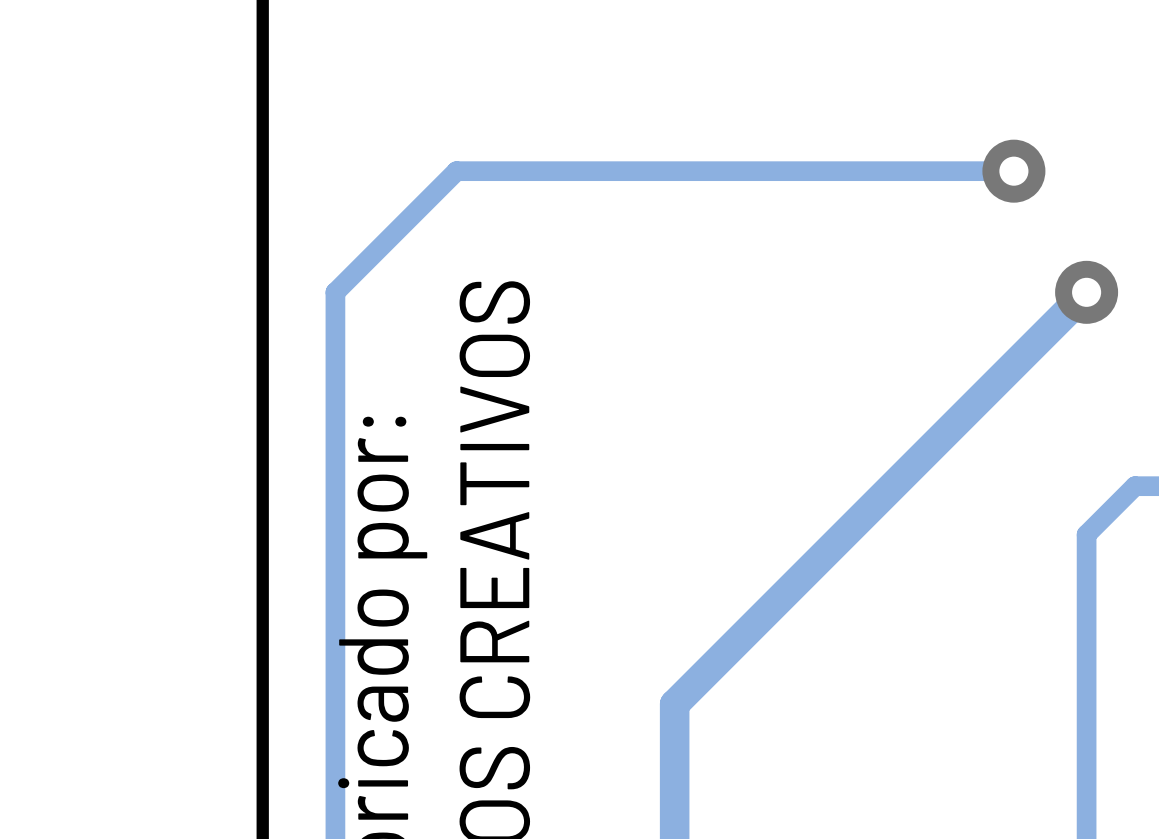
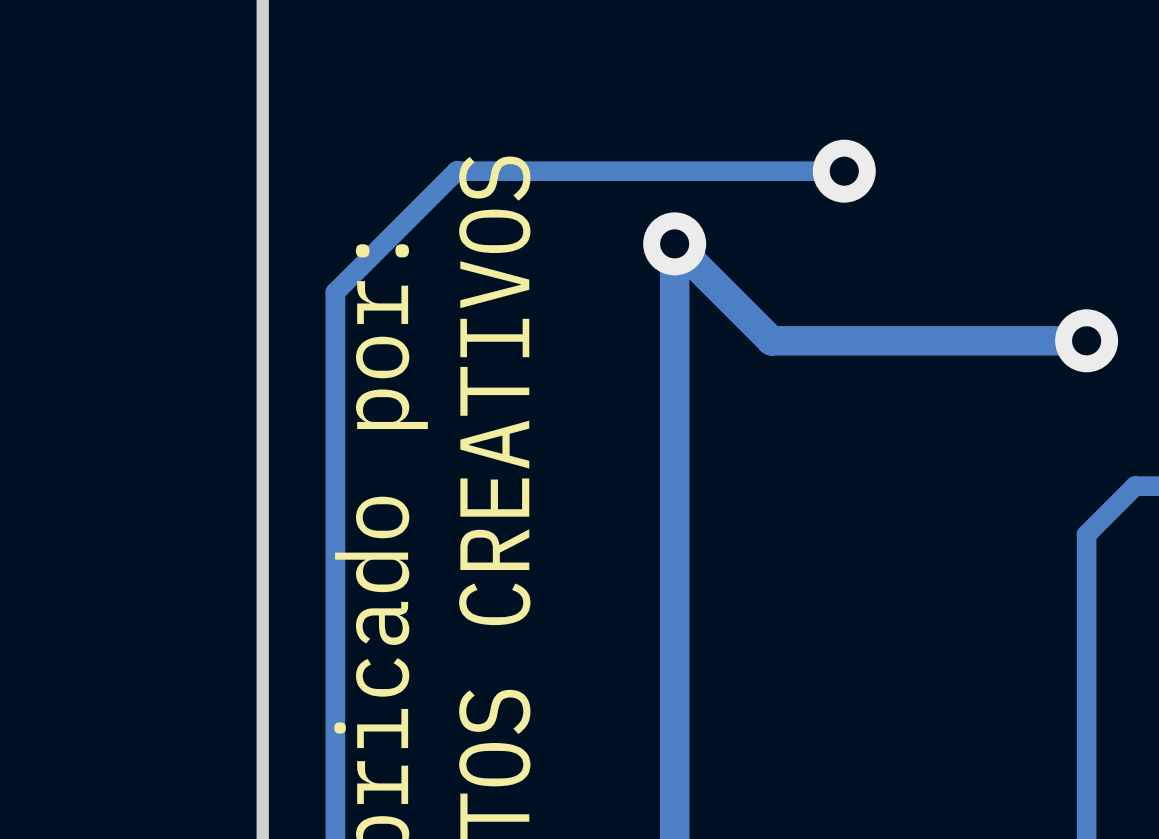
via: none -> (844, 171)
track: (1013, 171) (844, 171) -> none
via: (1013, 171) -> none
via: none -> (674, 243)
track: (1086, 292) (674, 704) -> (1086, 340) (771, 340) (674, 243) (674, 704)
via position: (1086, 292) -> (1086, 340)

